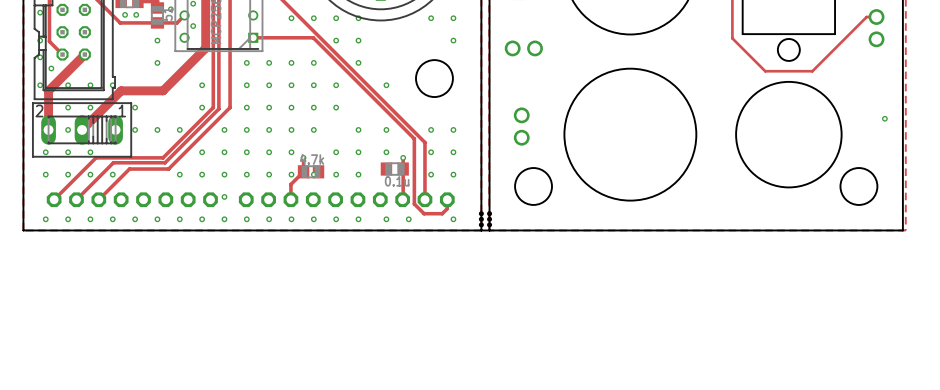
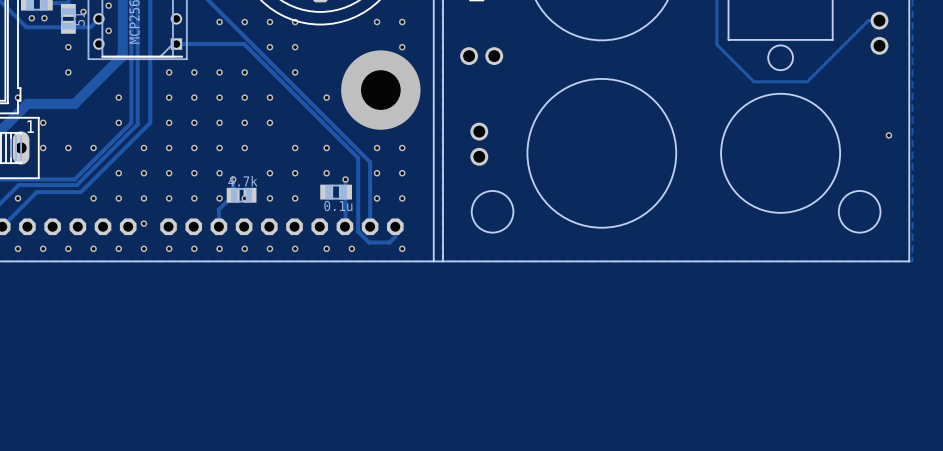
round board edge: [415, 59, 454, 98] -> none
via: none -> (380, 90)
hole: (481, 213) -> none
hole: (489, 213) -> none
hole: (481, 219) -> none
hole: (489, 219) -> none
hole: (481, 224) -> none
hole: (489, 224) -> none

